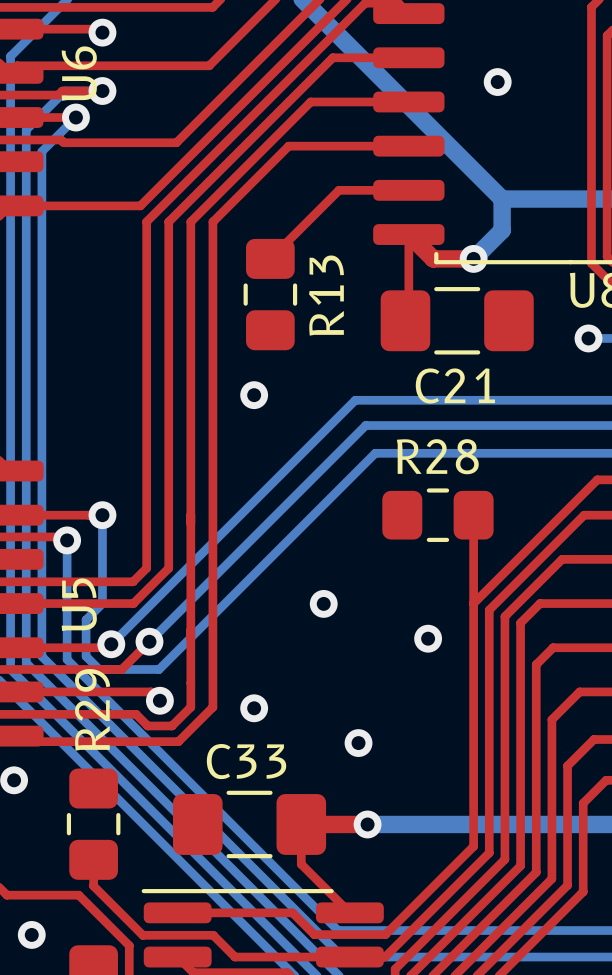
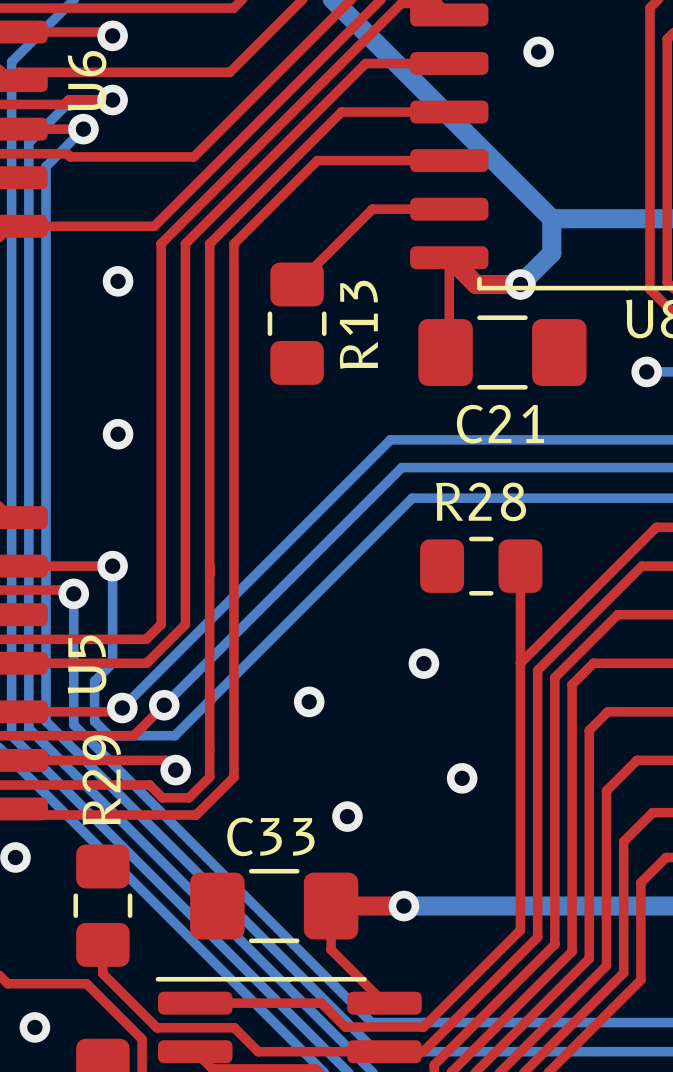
via position: (497, 82) -> (538, 51)
via: none -> (118, 281)
via: none -> (118, 434)
via: (254, 395) -> none
via: (323, 603) -> none
via: none -> (423, 663)
via: none -> (309, 701)
via: (428, 638) -> none
via: (254, 708) -> none
via: none -> (462, 778)
via: none -> (347, 816)
via: (358, 743) -> none

